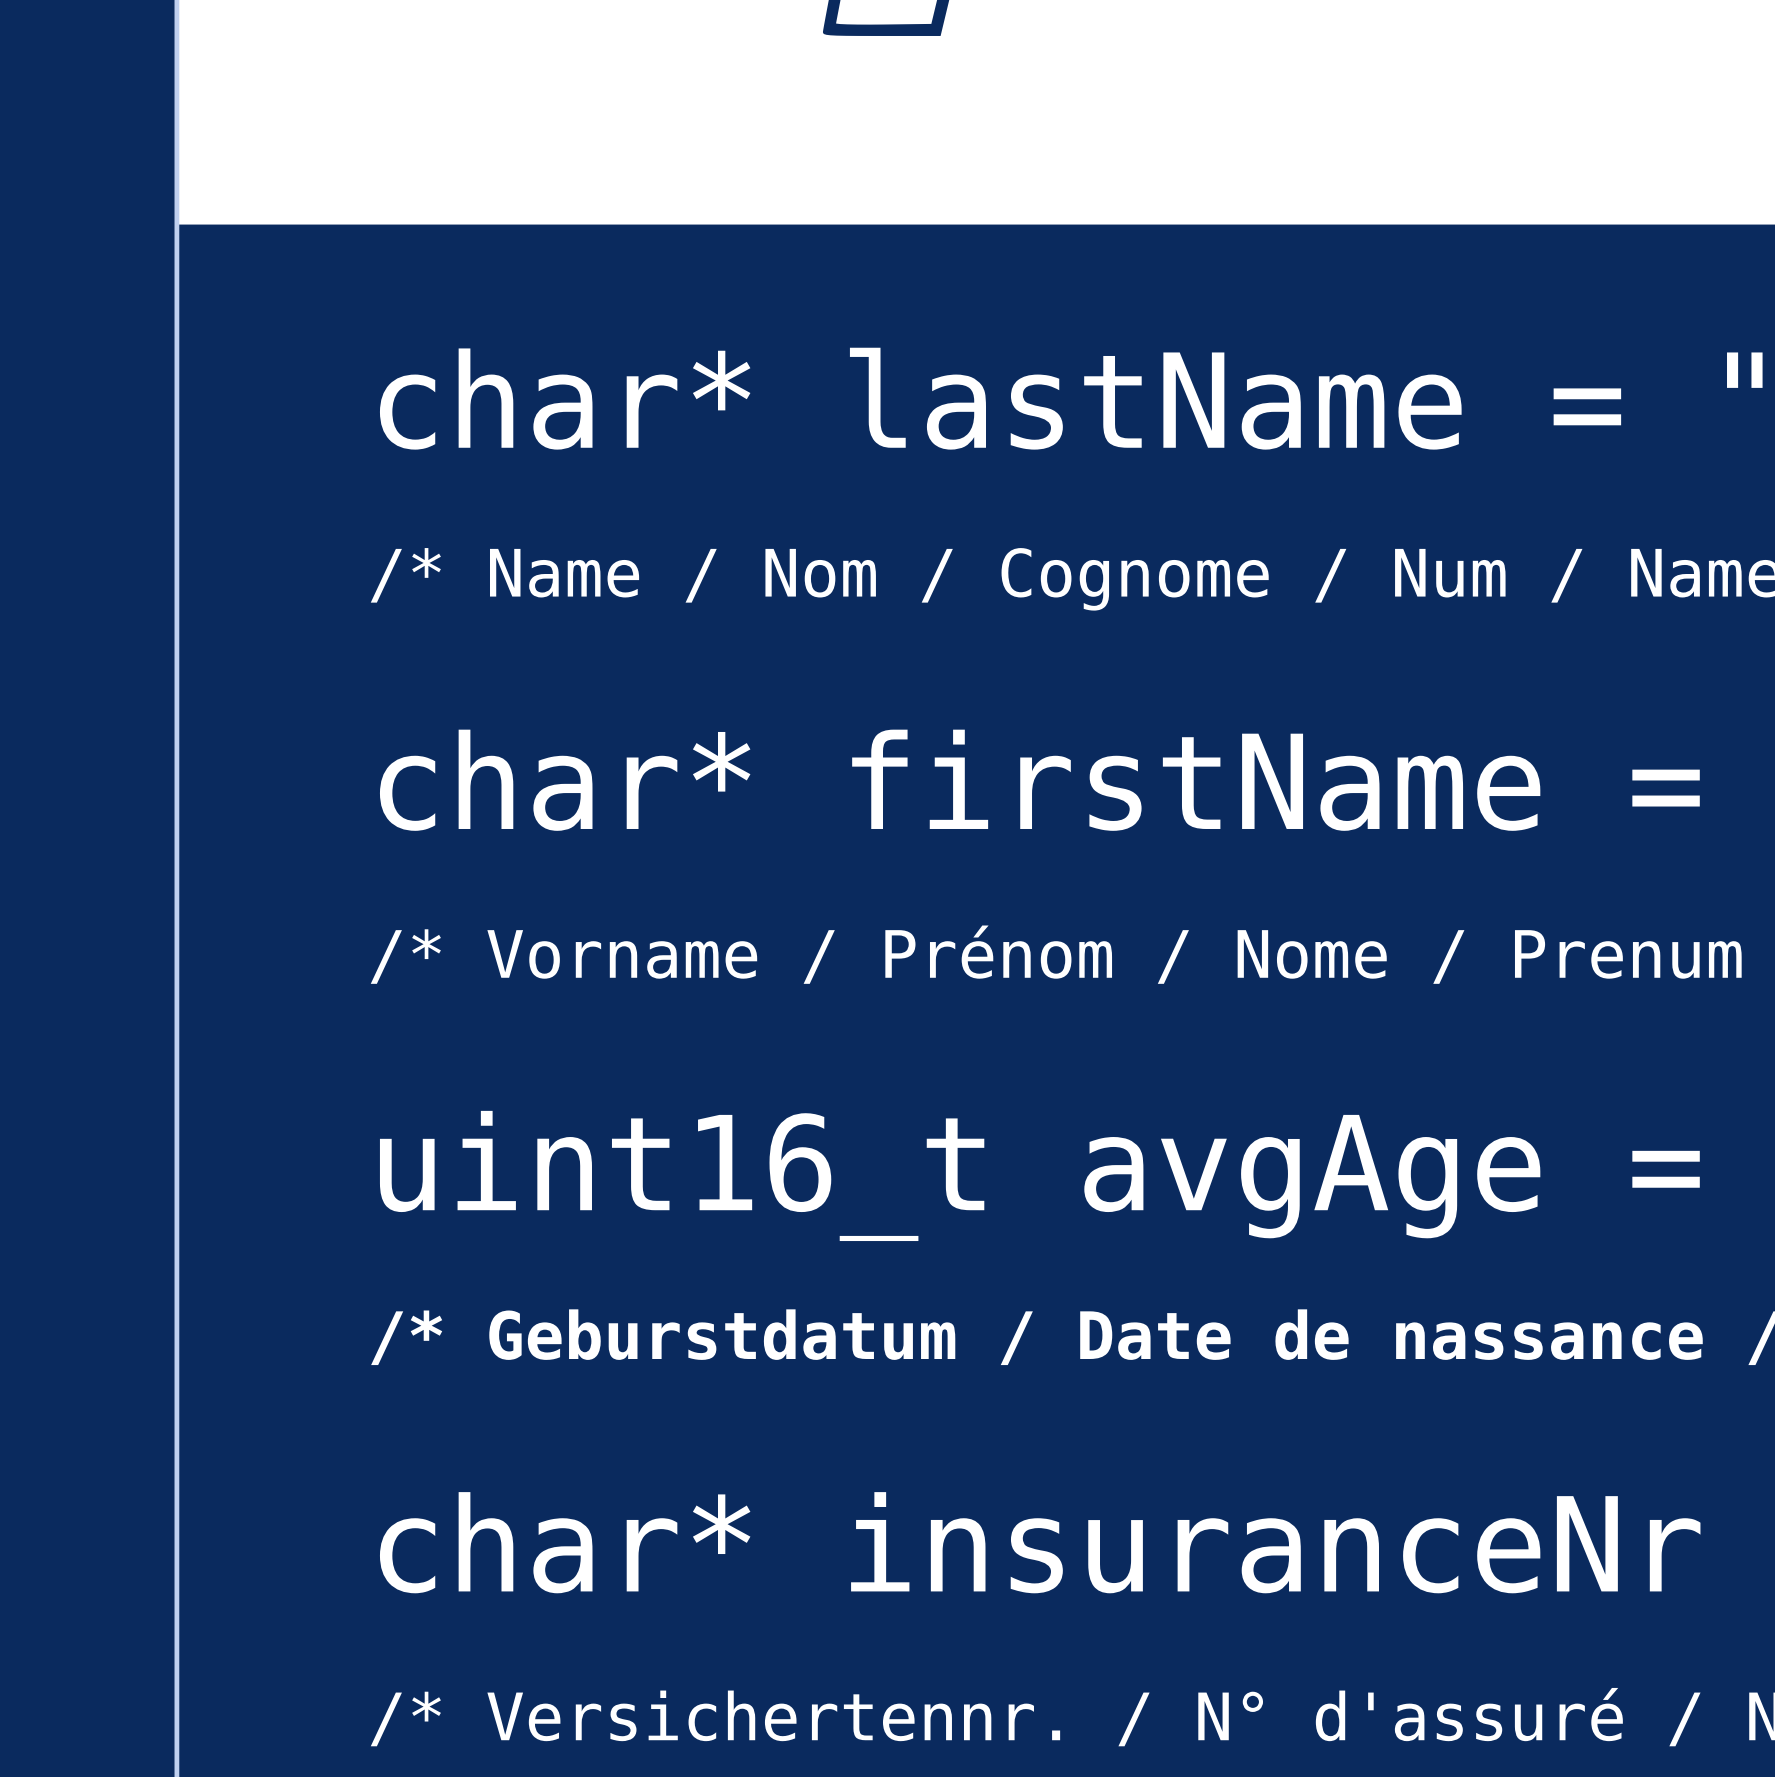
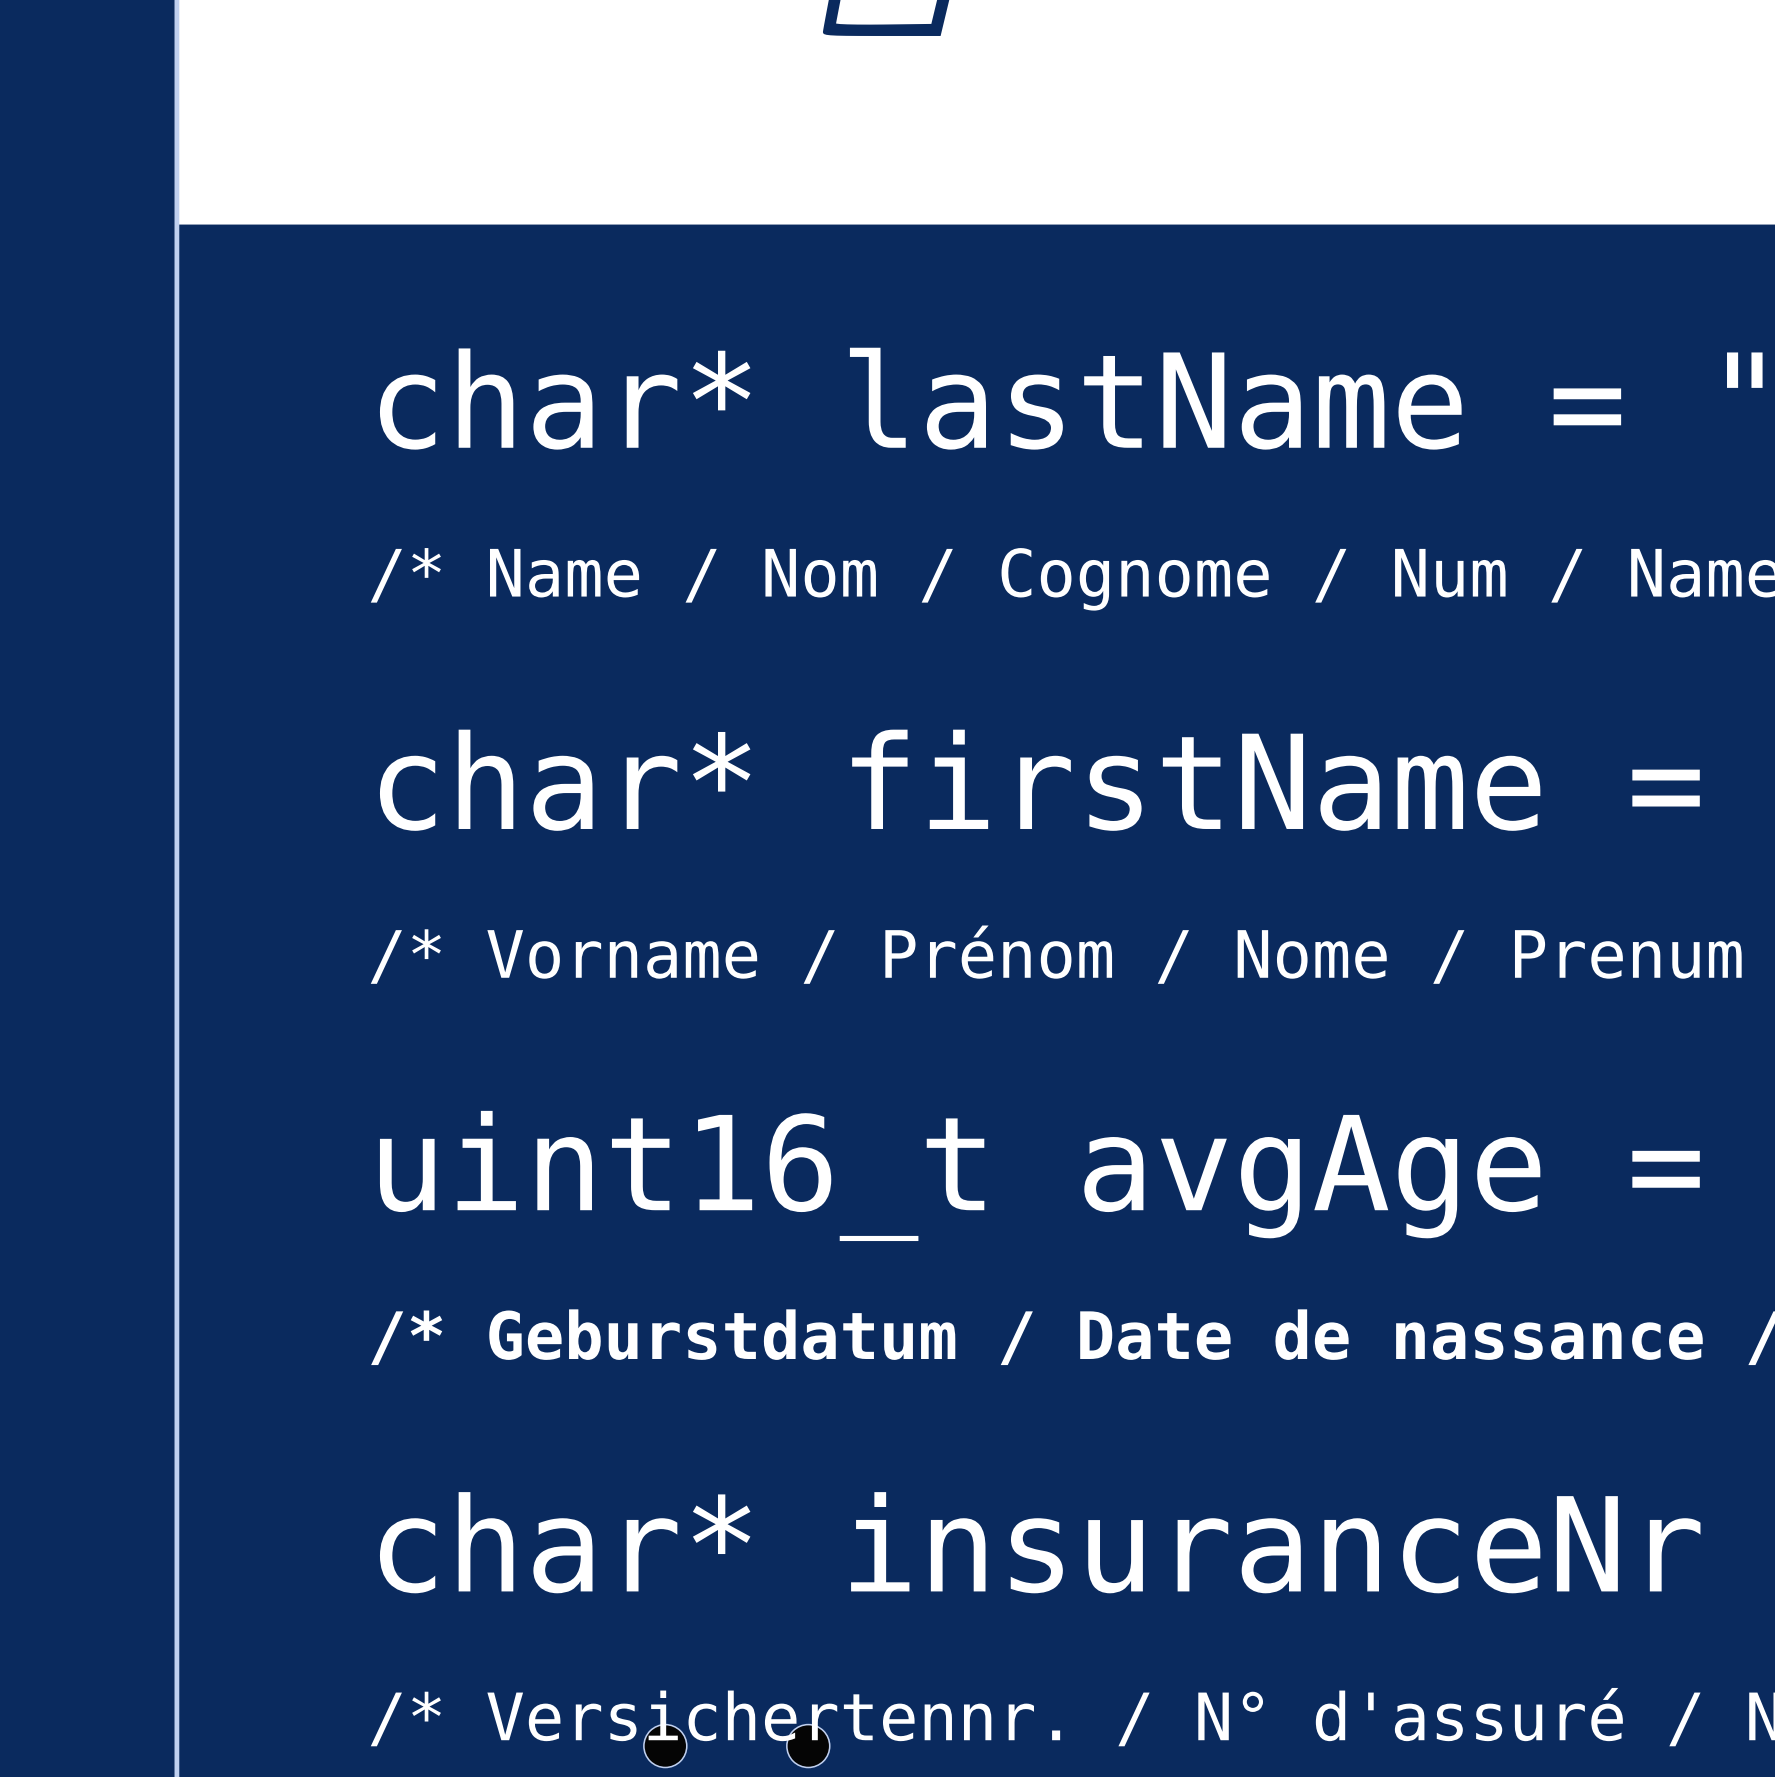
part: none -> (736, 1746)

